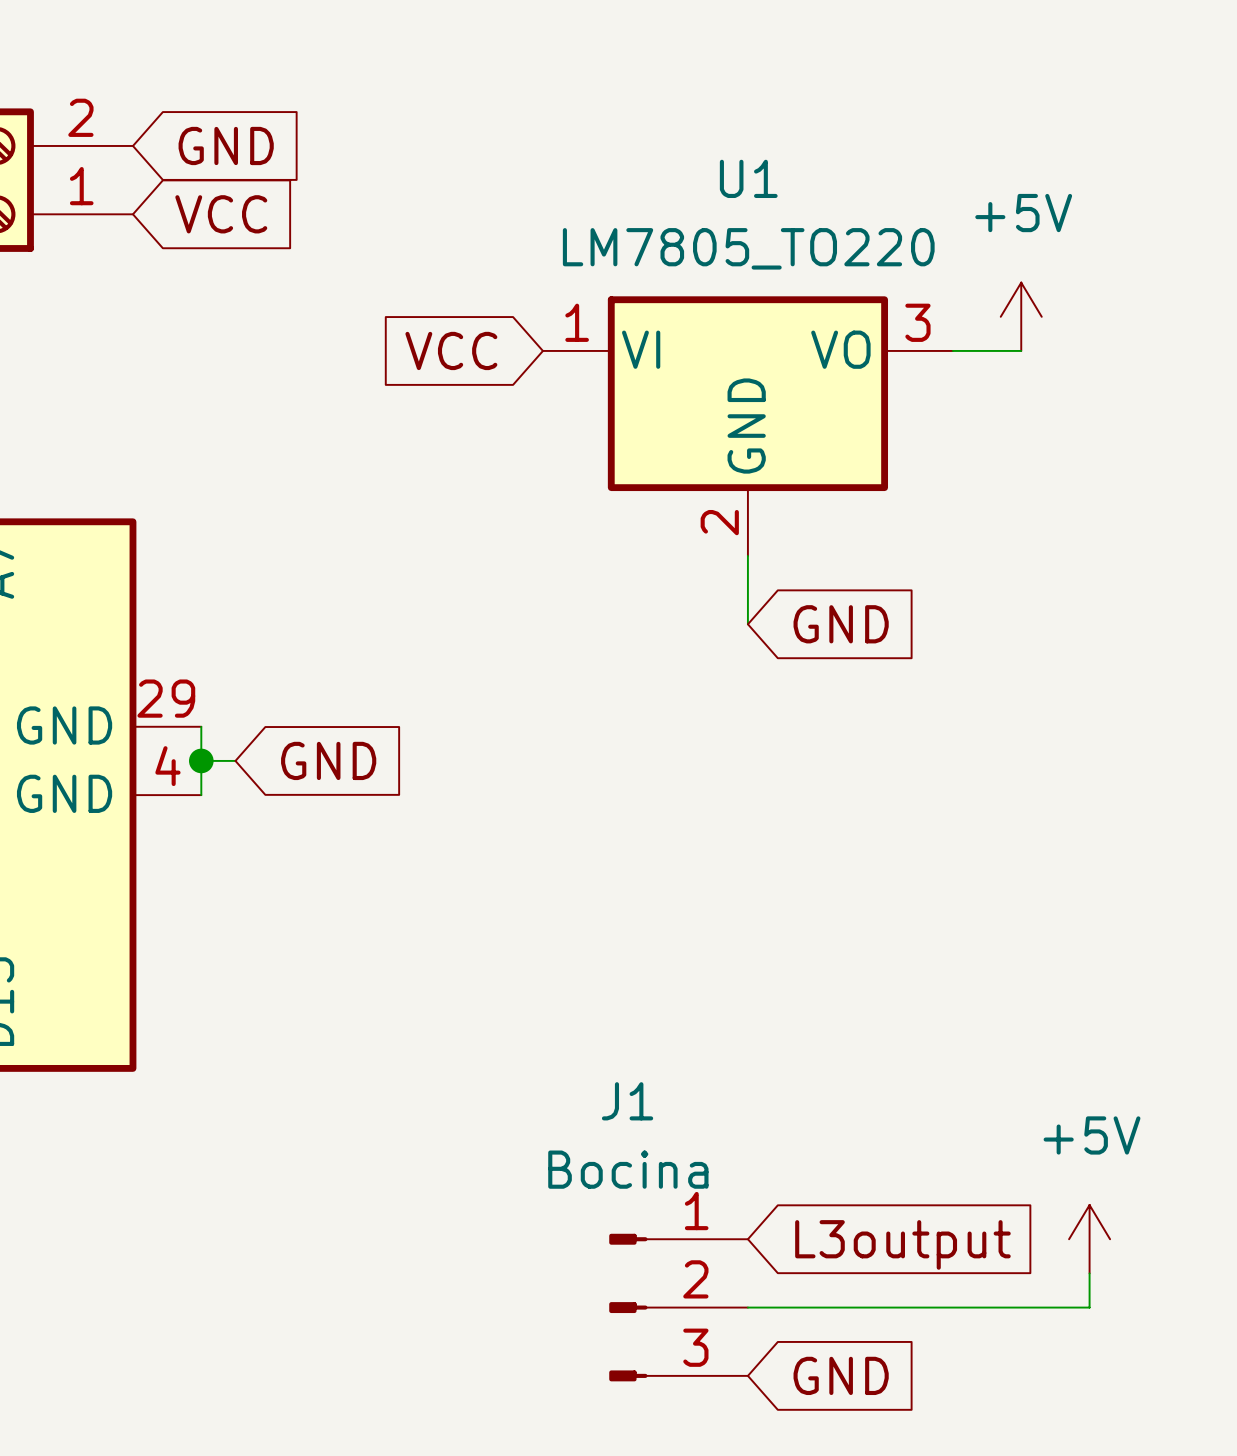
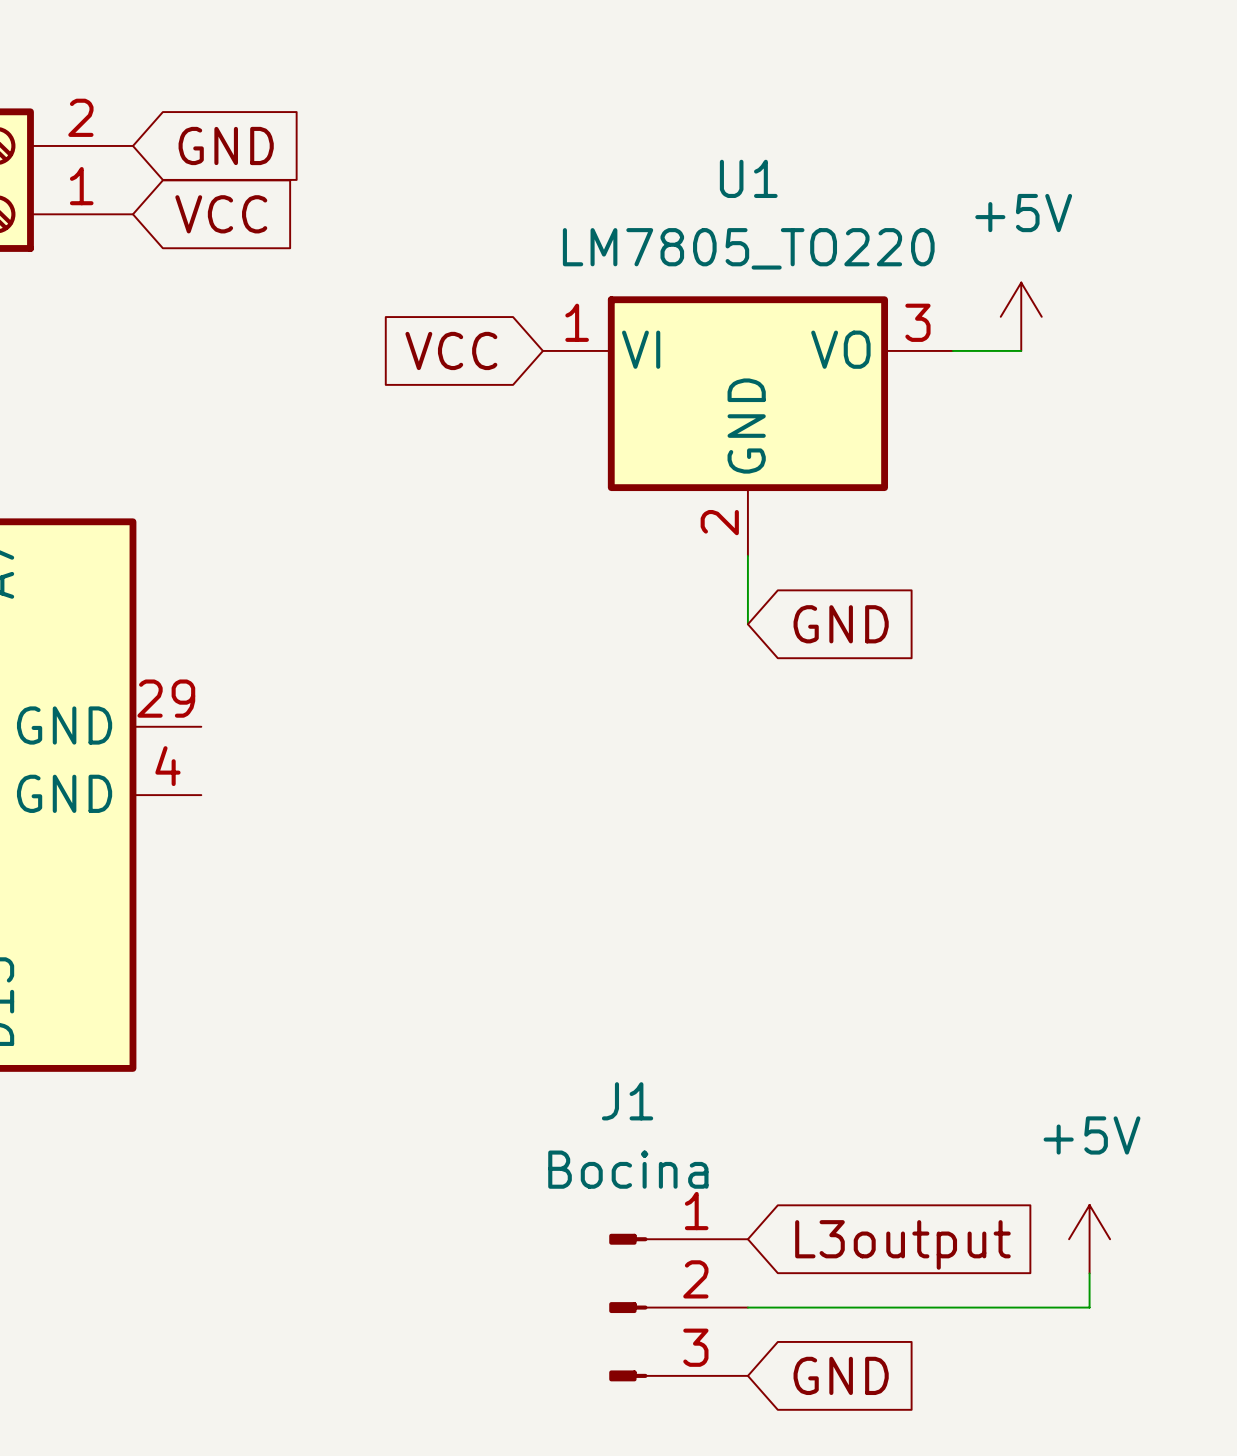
wire: (201, 726) (201, 795) -> none
wire: (201, 760) (235, 760) -> none
junction: (201, 760) -> none
global label: GND (328, 760) -> none

